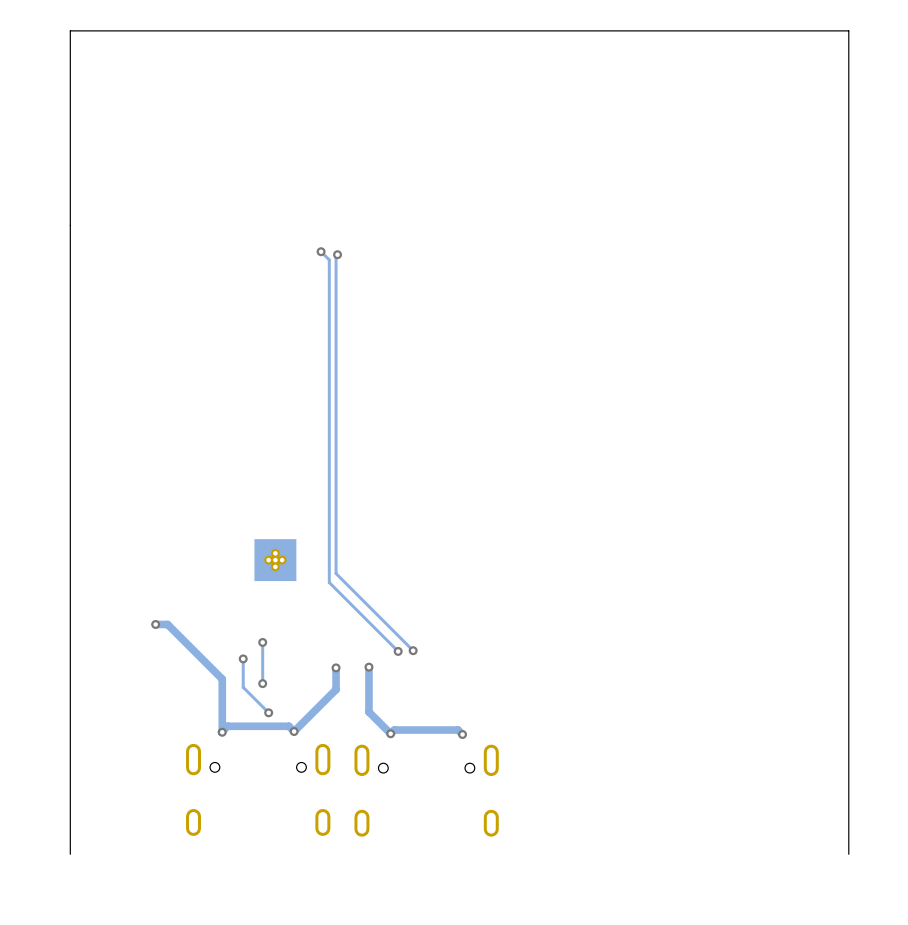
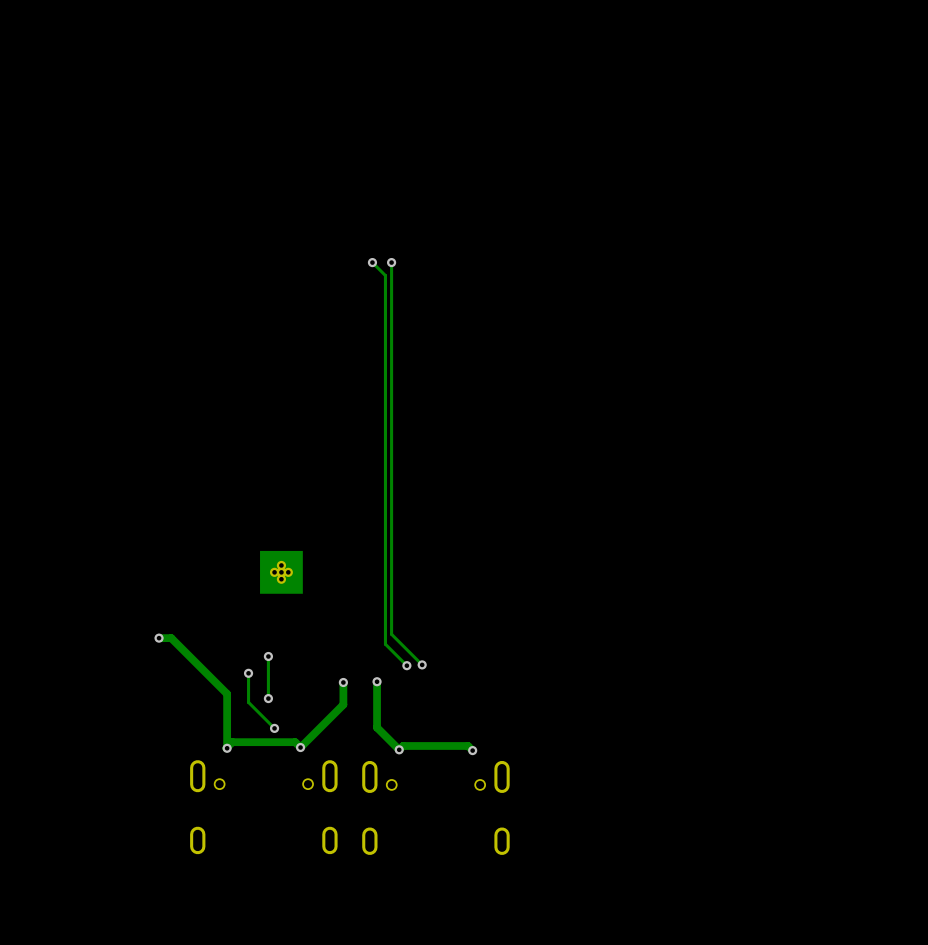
track: (321, 251) (329, 259) (329, 582) (377, 630) -> (372, 262) (385, 275) (385, 644)
via: (321, 251) -> none
track: (337, 254) (336, 573) (383, 620) -> (391, 262) (391, 634)
via: (337, 254) -> none
via: none -> (372, 262)
via: none -> (391, 262)
board edge: (848, 854) (848, 30) (70, 30) (70, 854) -> none

